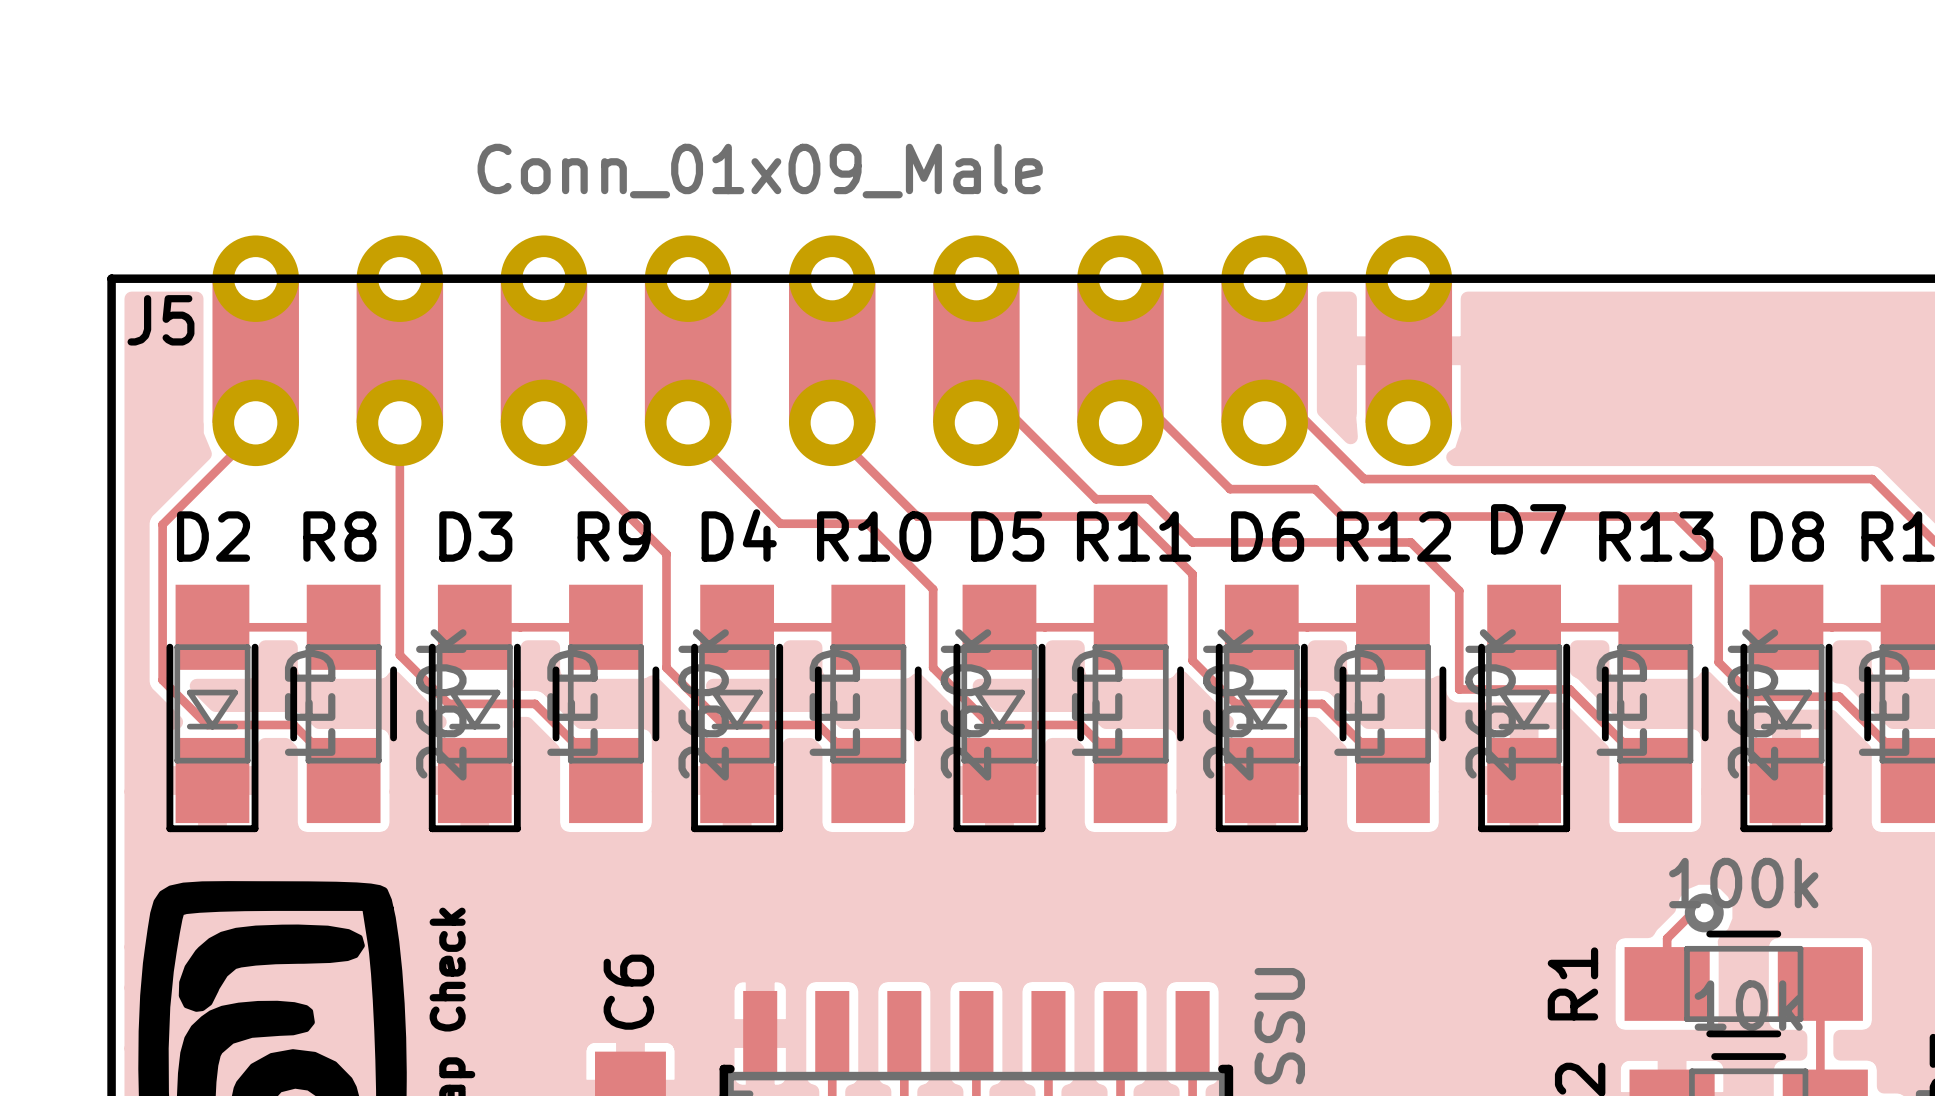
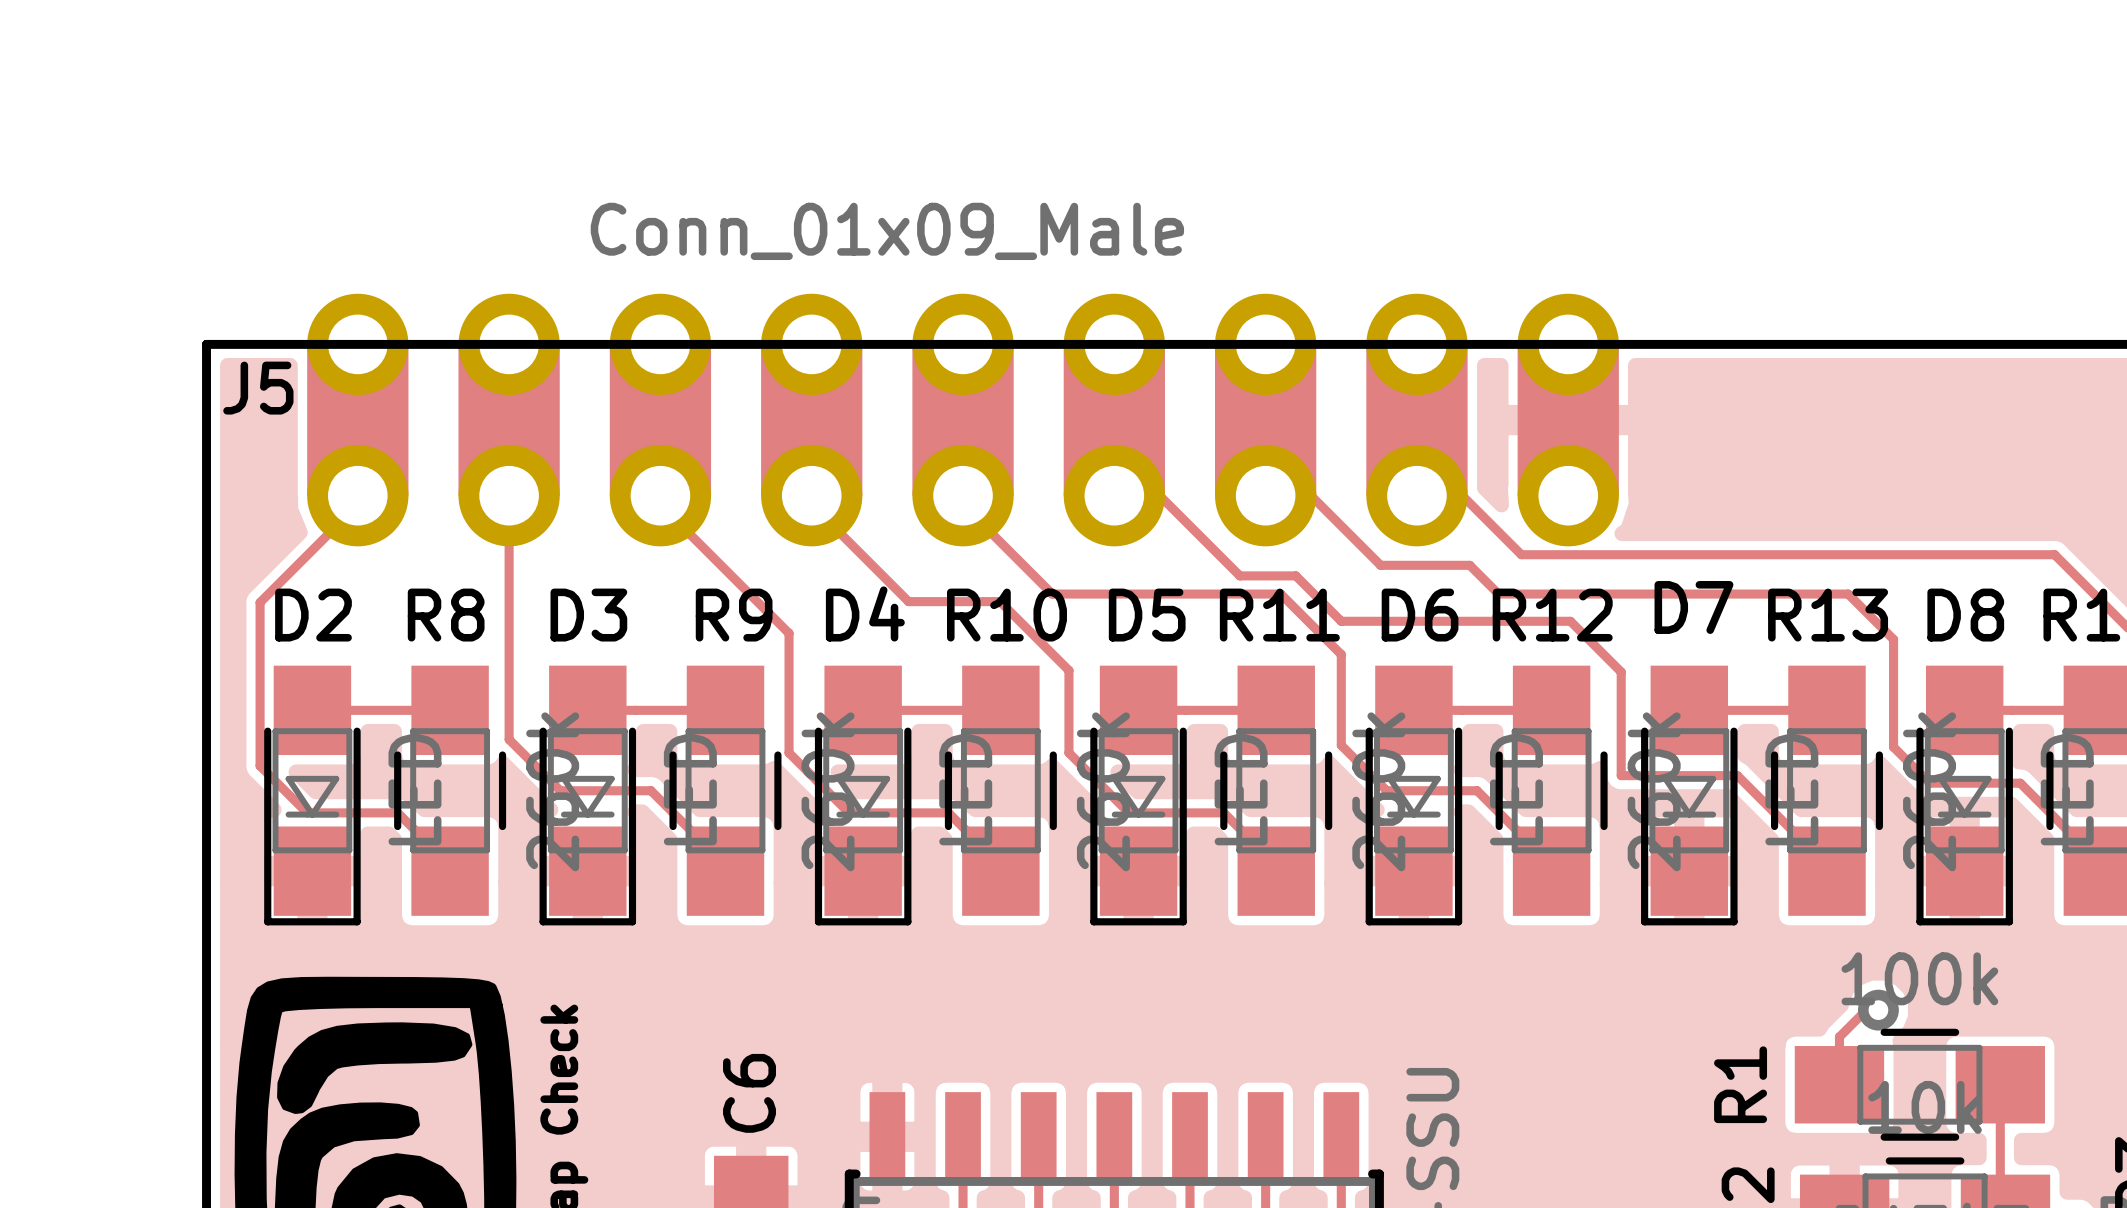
J5 footprint: [180, 235, 1484, 467] -> [279, 293, 1647, 547]

